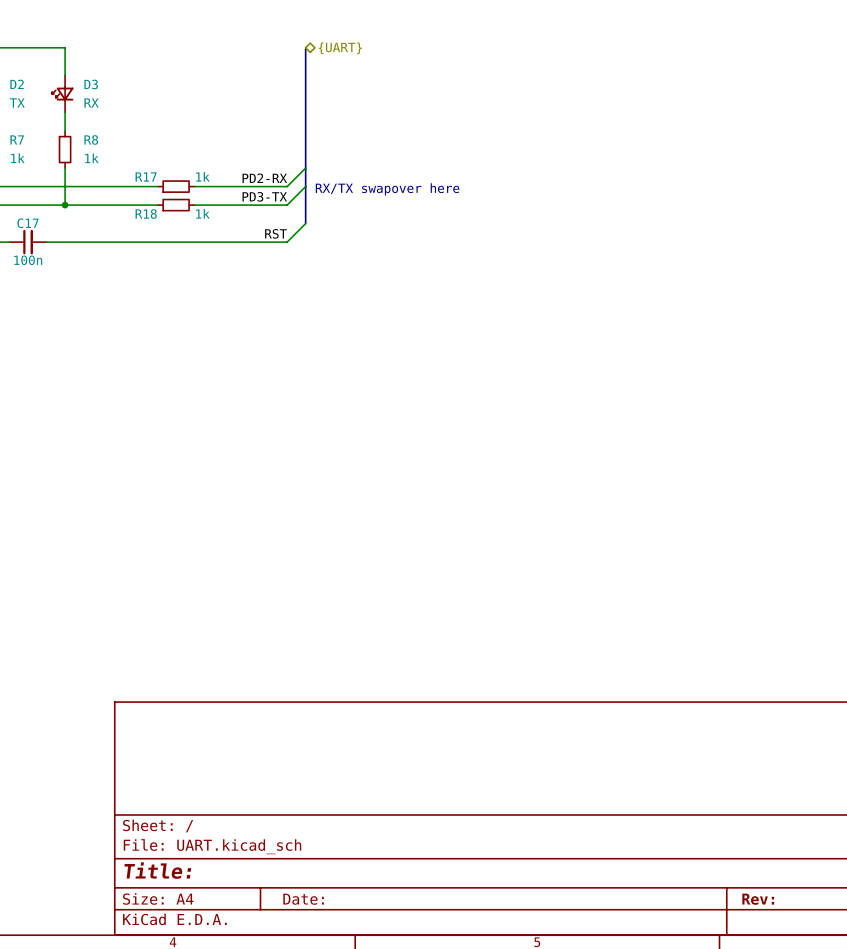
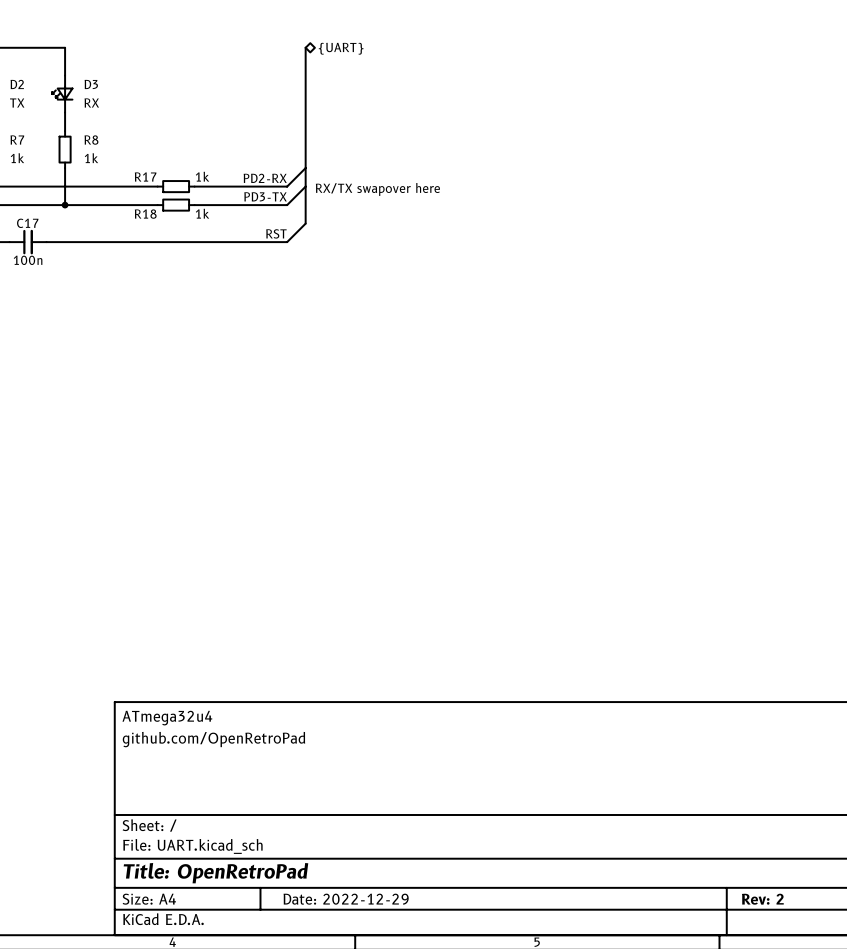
title block: none -> ATmega32u4 (167, 718)
title block: none -> github.com/OpenRetroPad (213, 739)
title block: Title: (157, 870) -> Title: OpenRetroPad (215, 873)
title block: Date: (303, 899) -> Date: 2022-12-29 (346, 899)
title block: Rev: (758, 899) -> Rev: 2 (762, 899)

